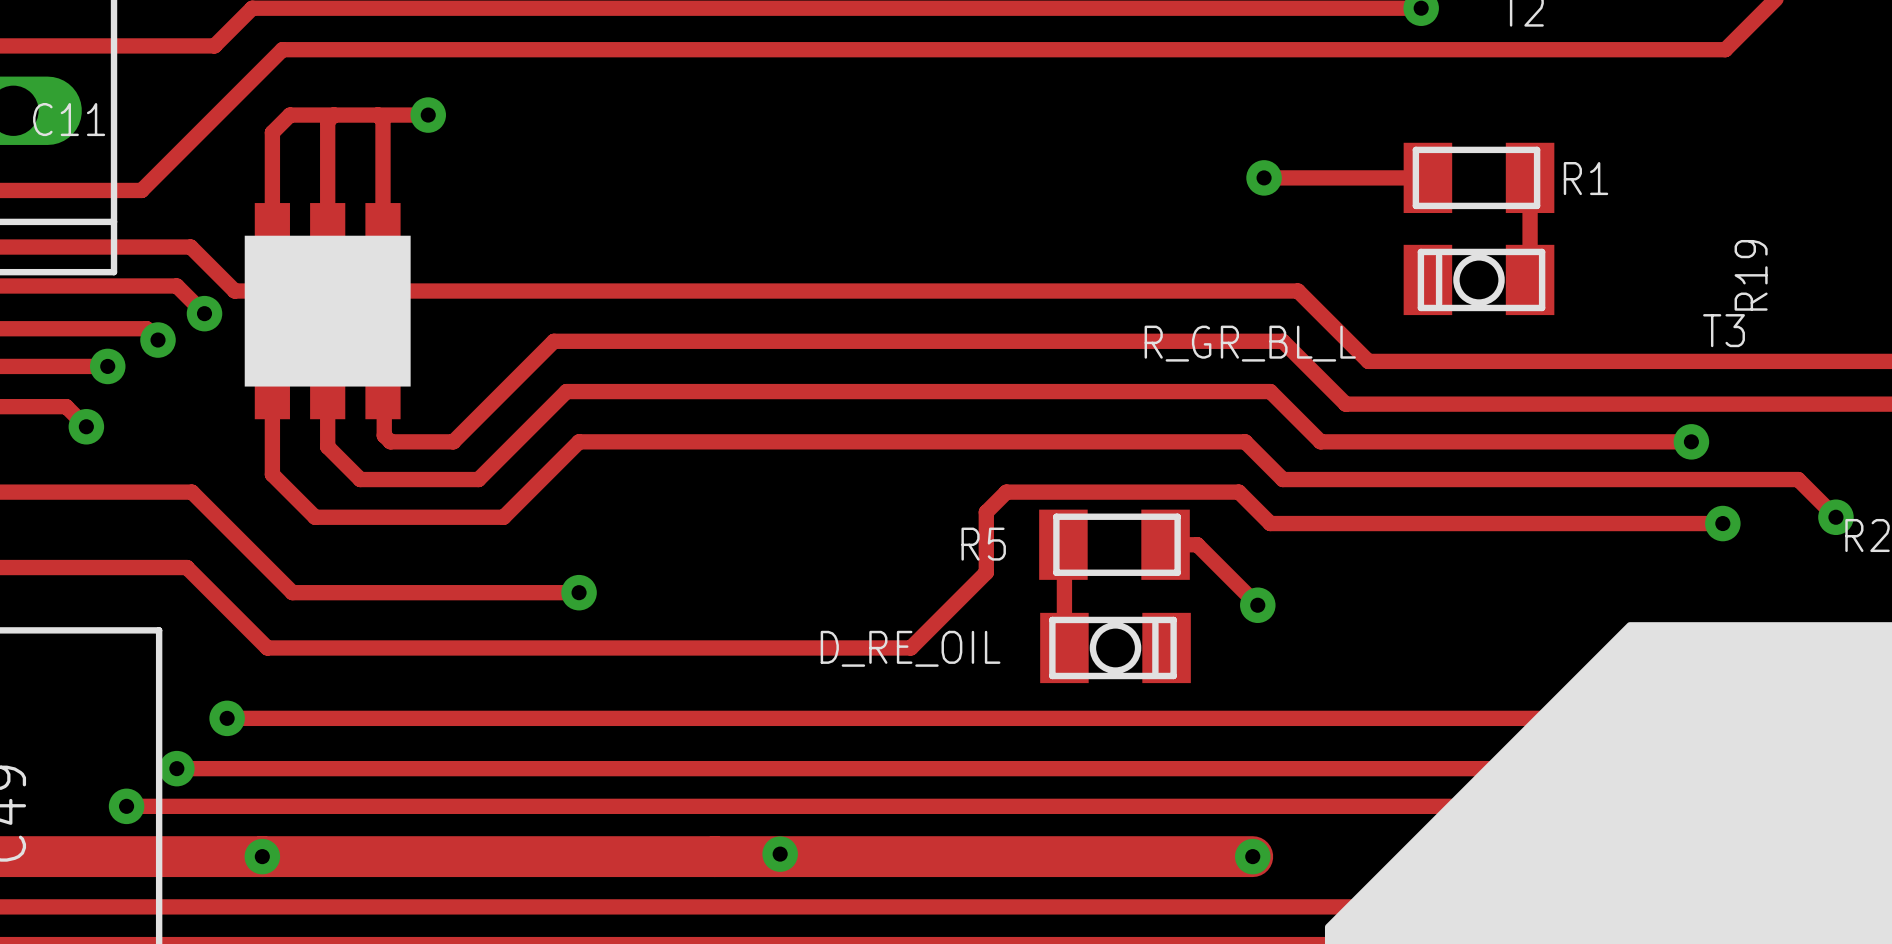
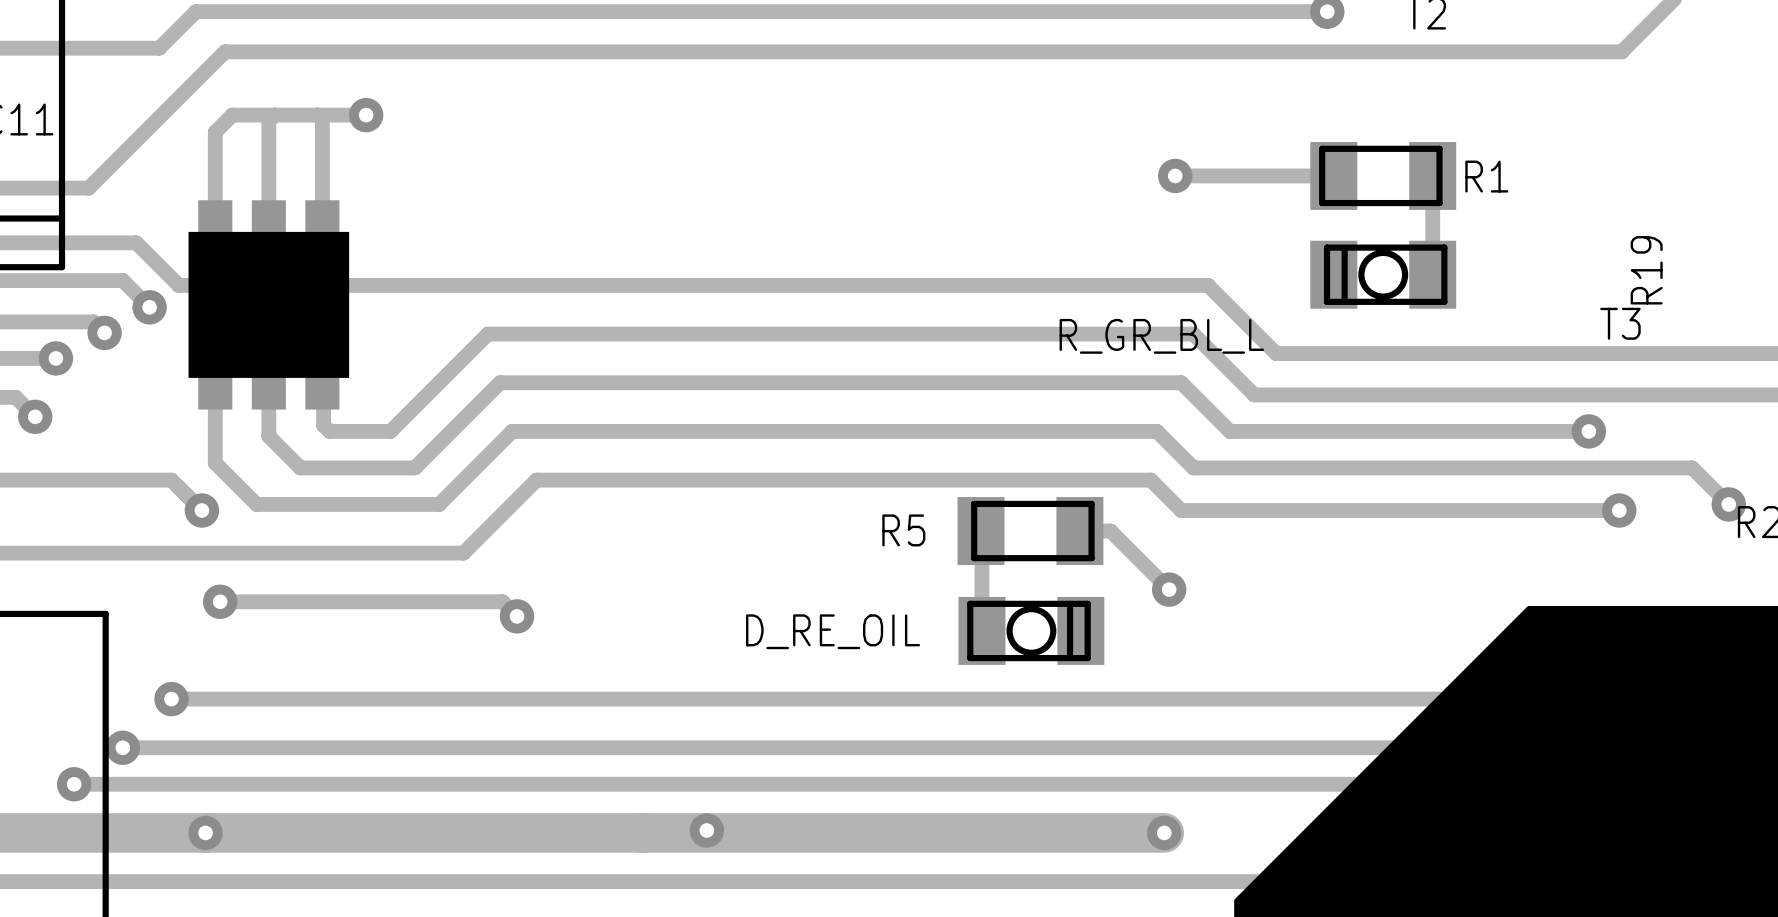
track: (191, 492) (292, 592) (579, 592) -> (137, 480) (171, 480) (201, 510)
track: (1006, 492) (986, 512) (986, 572) (910, 647) (267, 647) (186, 567) -> (925, 480) (536, 480) (463, 553) (132, 553)
via: none -> (201, 510)
via position: (579, 592) -> (517, 616)
track: none -> (220, 601) (502, 601) (517, 616)
via: none -> (220, 601)

